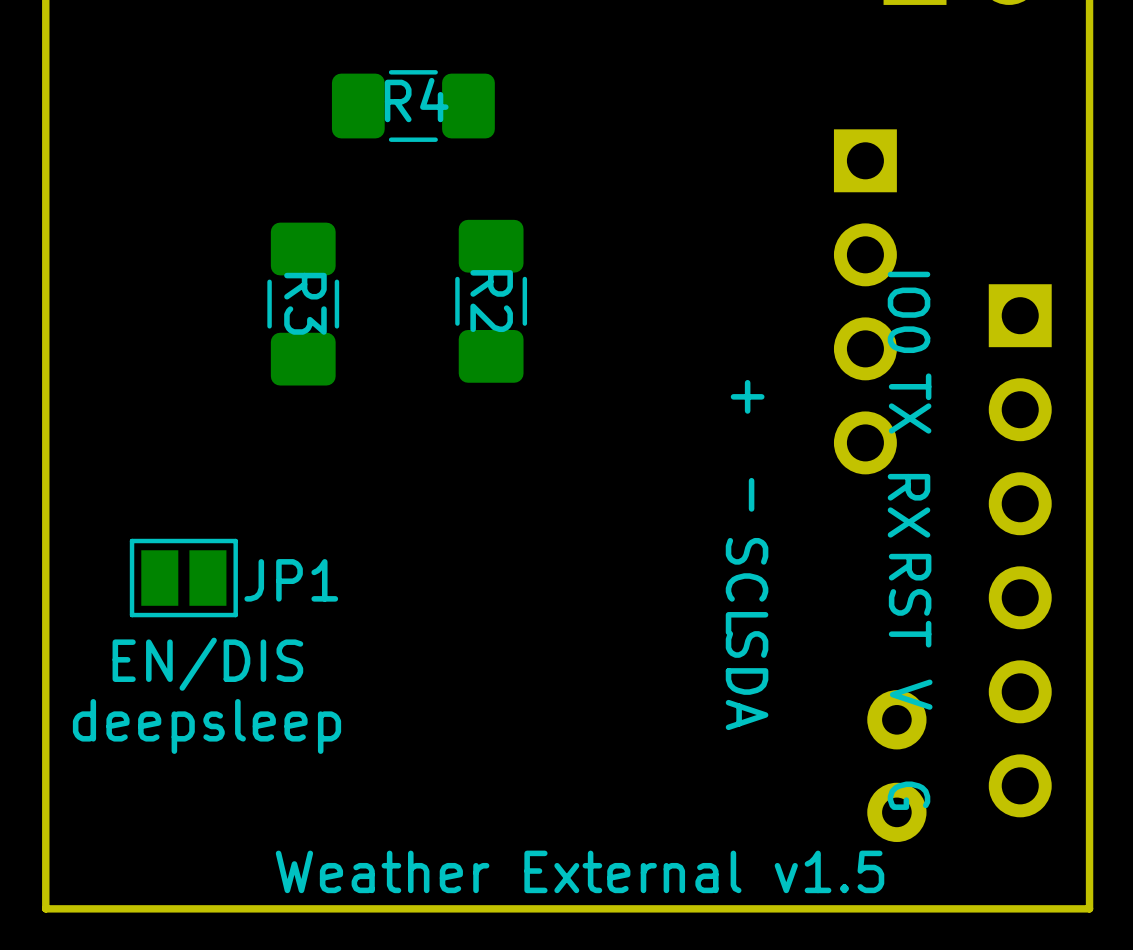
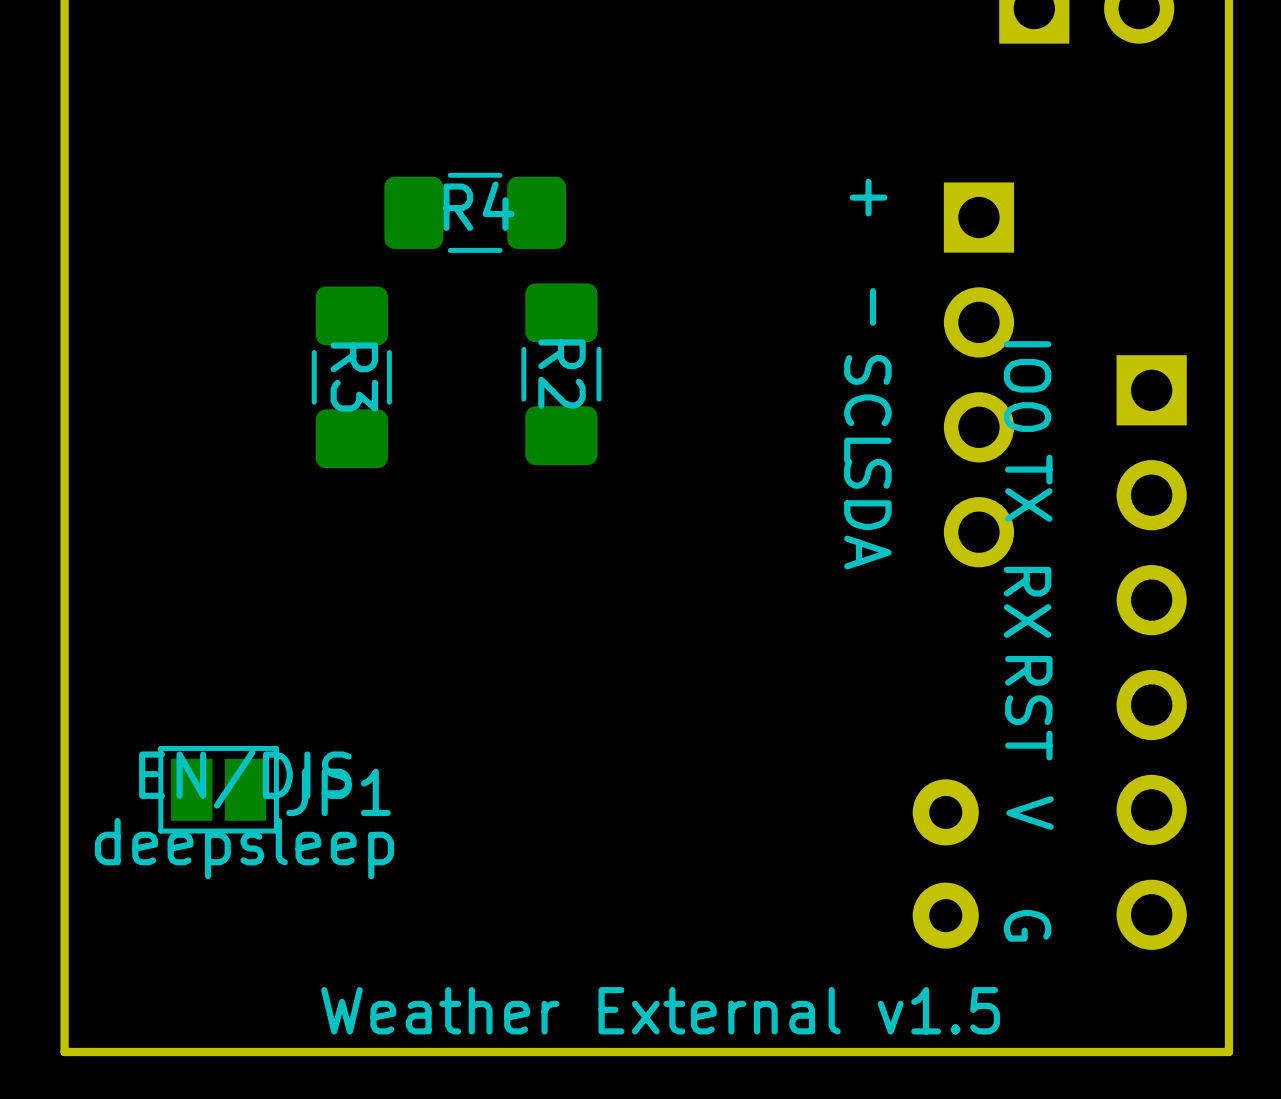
R4 position: (413, 106) -> (475, 212)
text position: + (747, 396) -> + (868, 197)
text position: - (751, 494) -> - (872, 306)
JP1 position: (183, 578) -> (218, 789)
text position: SCL (747, 586) -> SCL (867, 409)
text position: SDA (747, 680) -> SDA (867, 514)
part position: (896, 766) -> (945, 864)

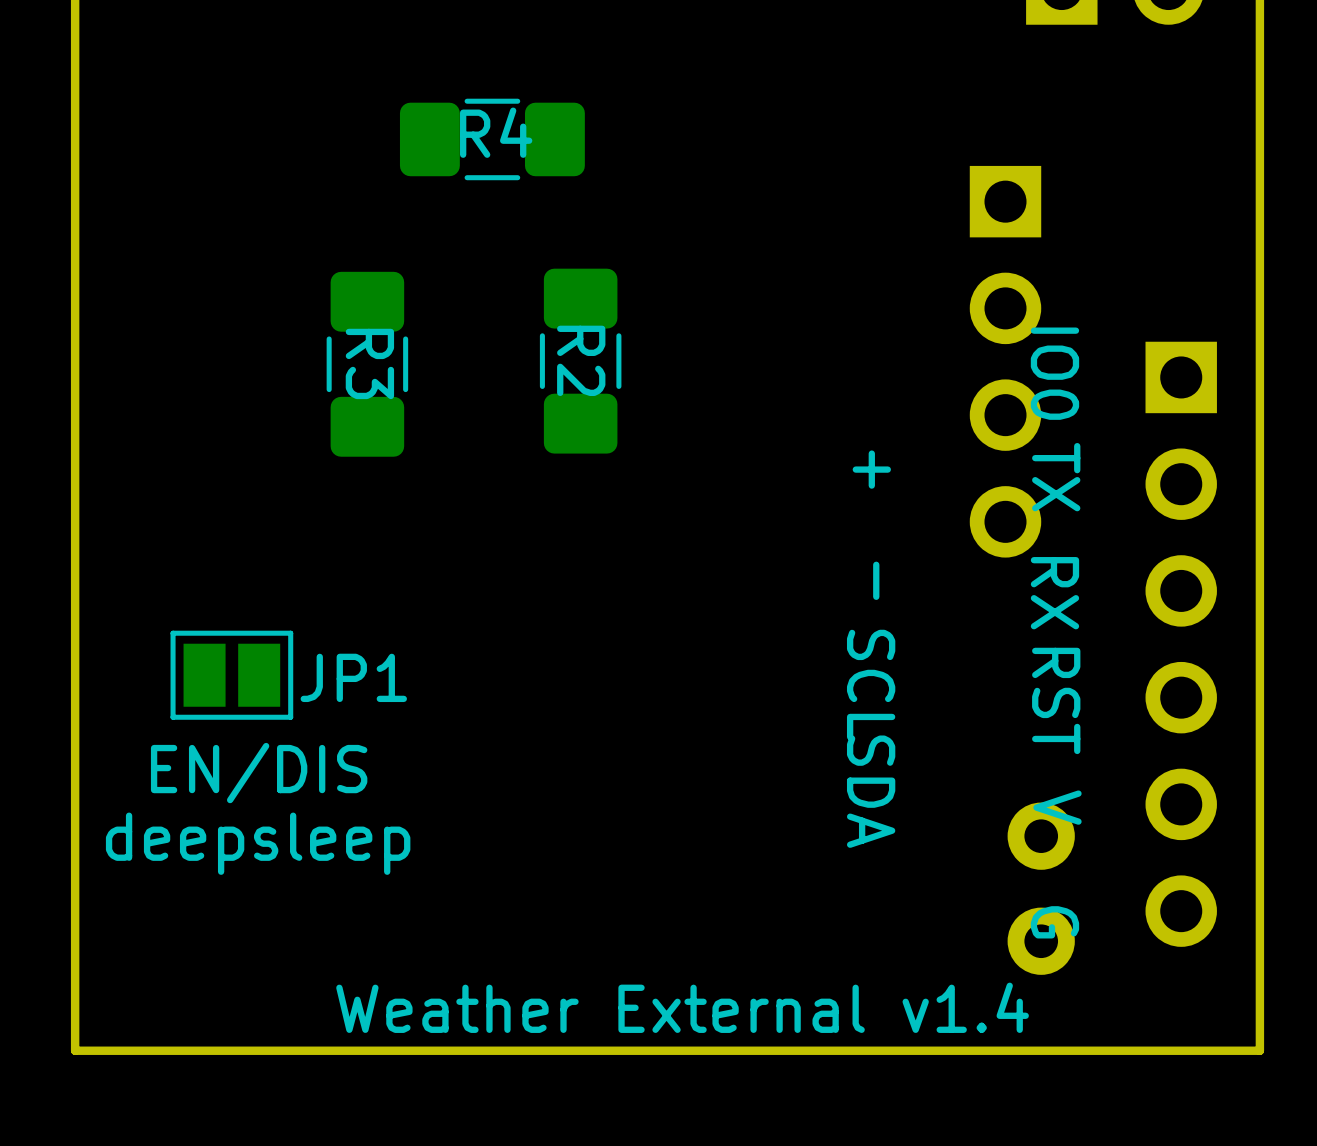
text position: + (868, 197) -> + (871, 469)
R4 position: (475, 212) -> (492, 139)
text position: - (872, 306) -> - (876, 580)
text position: SCL (867, 409) -> SCL (871, 684)
text position: SDA (867, 514) -> SDA (871, 791)
JP1 position: (218, 789) -> (231, 675)
part position: (945, 864) -> (1041, 888)
text: Weather External v1.5 (660, 1010) -> Weather External v1.4 (682, 1007)

